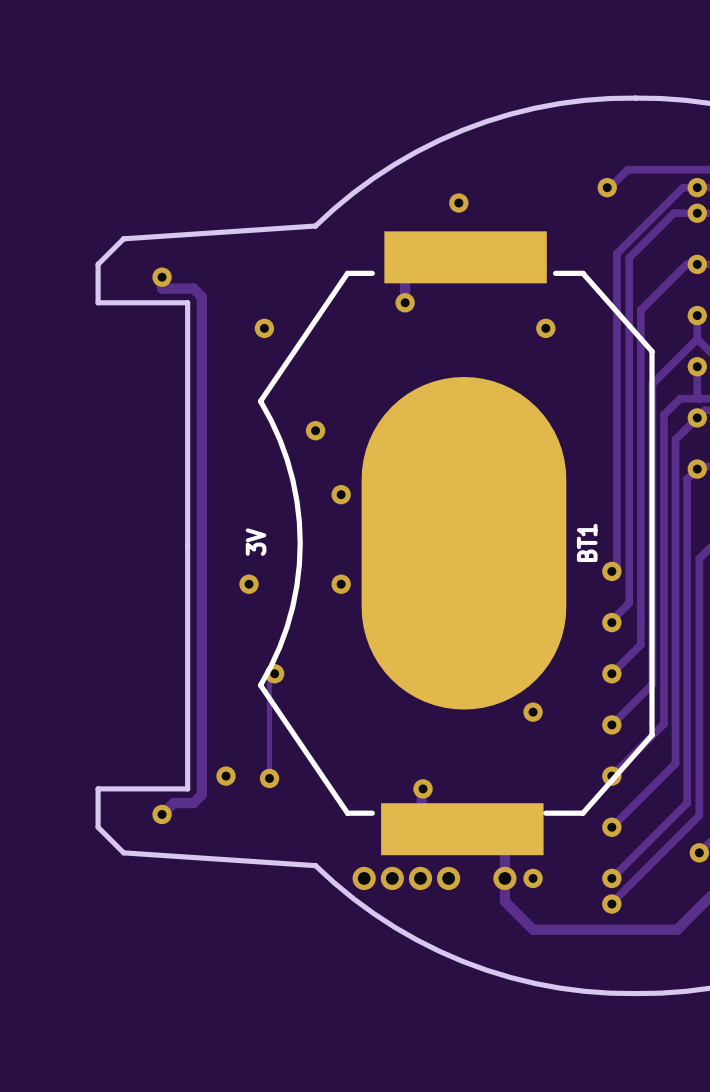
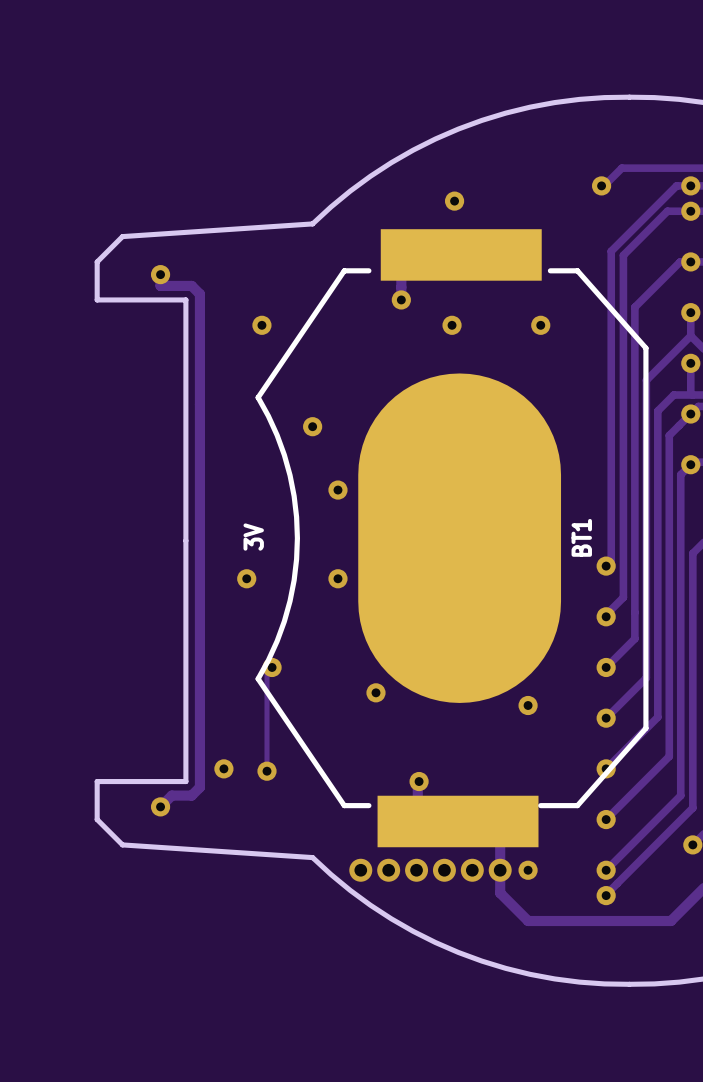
via: none -> (452, 325)
via: none -> (376, 692)
via: none -> (472, 870)

